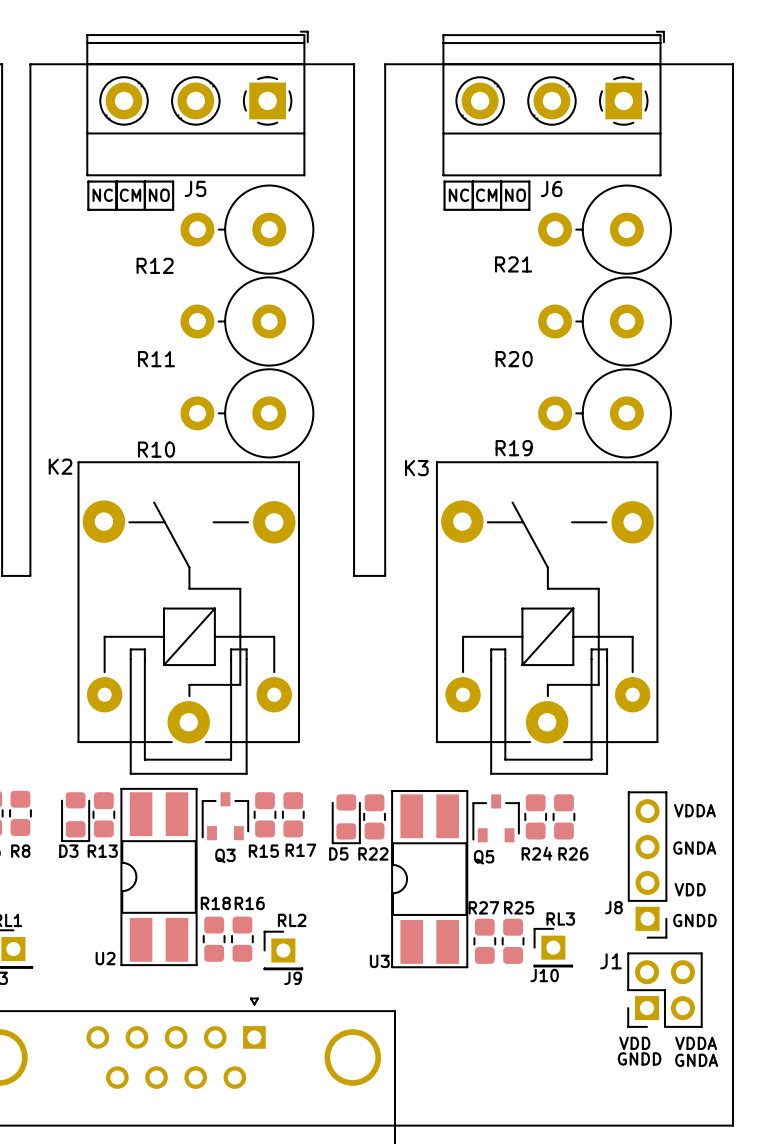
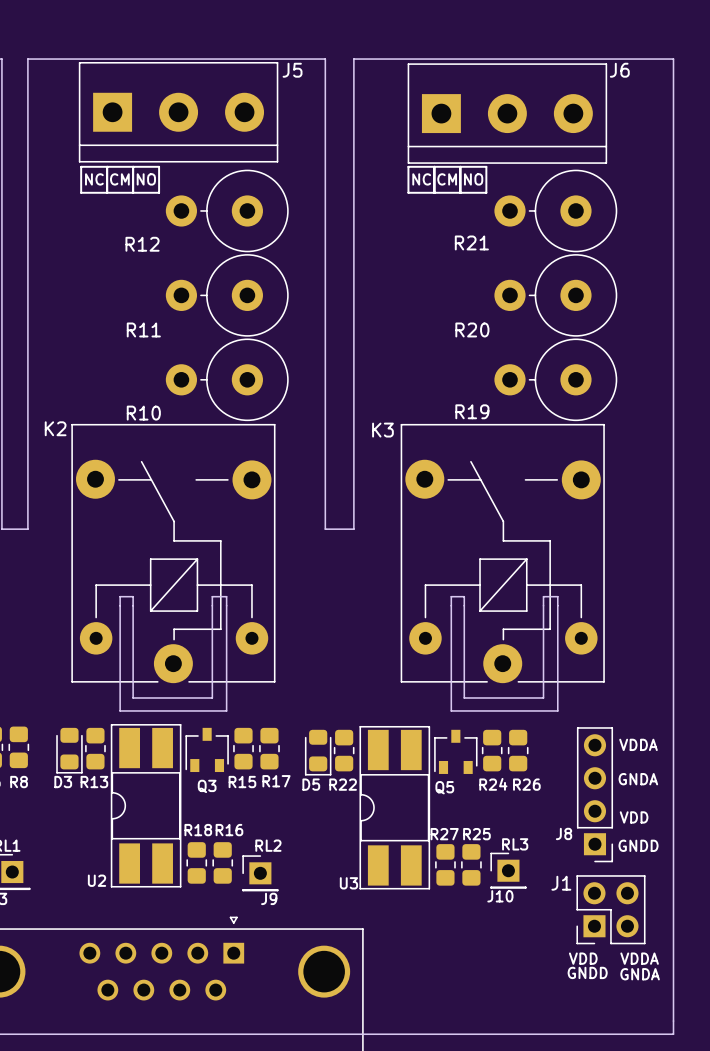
J5 footprint: [86, 30, 309, 177] -> [78, 62, 279, 163]
J6 footprint: [442, 30, 665, 177] -> [407, 63, 608, 164]
J5 name position: J5 (195, 188) -> J5 (292, 70)
J6 name position: J6 (551, 188) -> J6 (619, 70)

